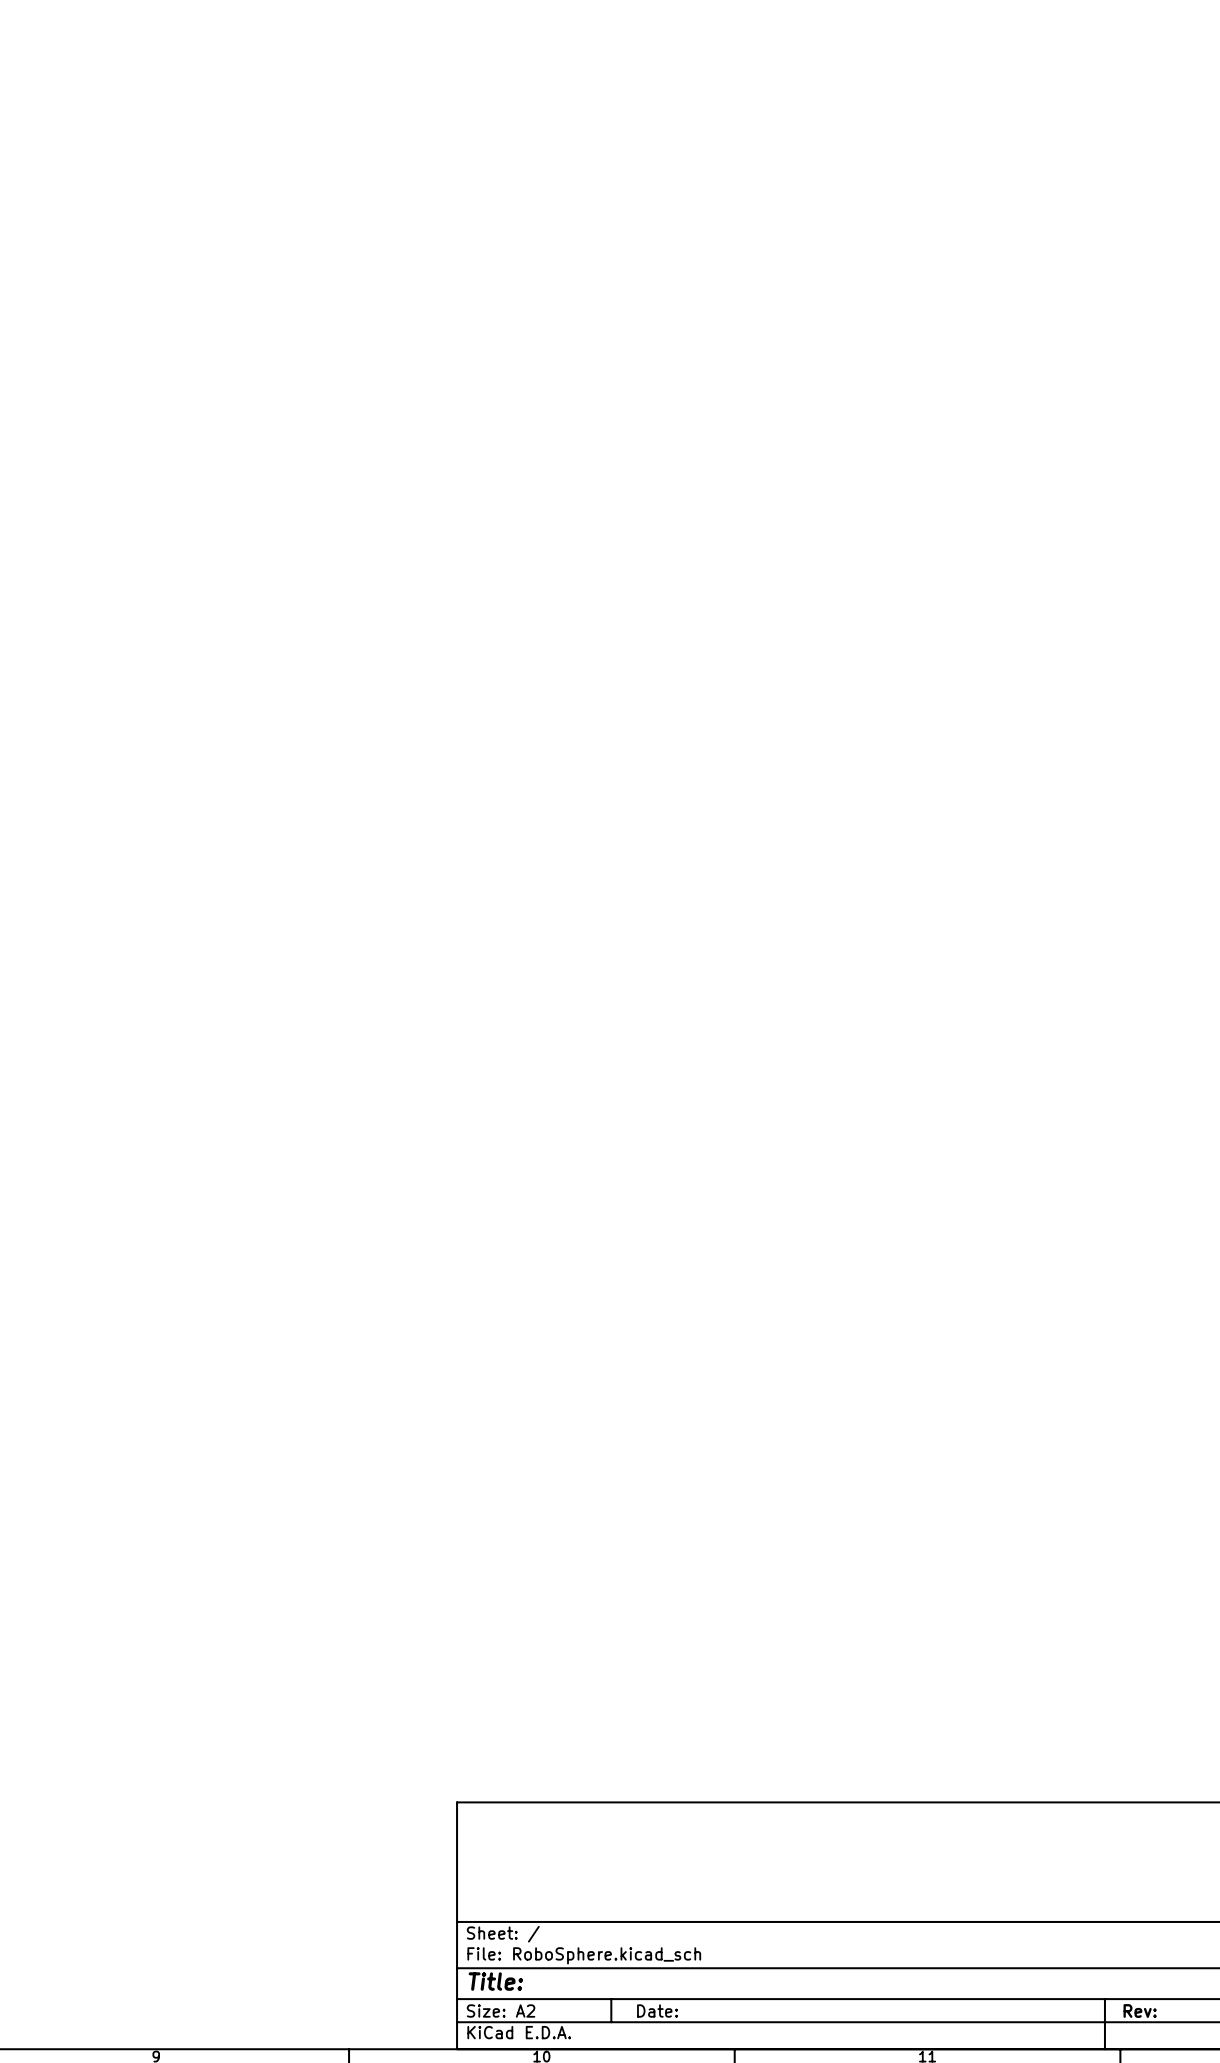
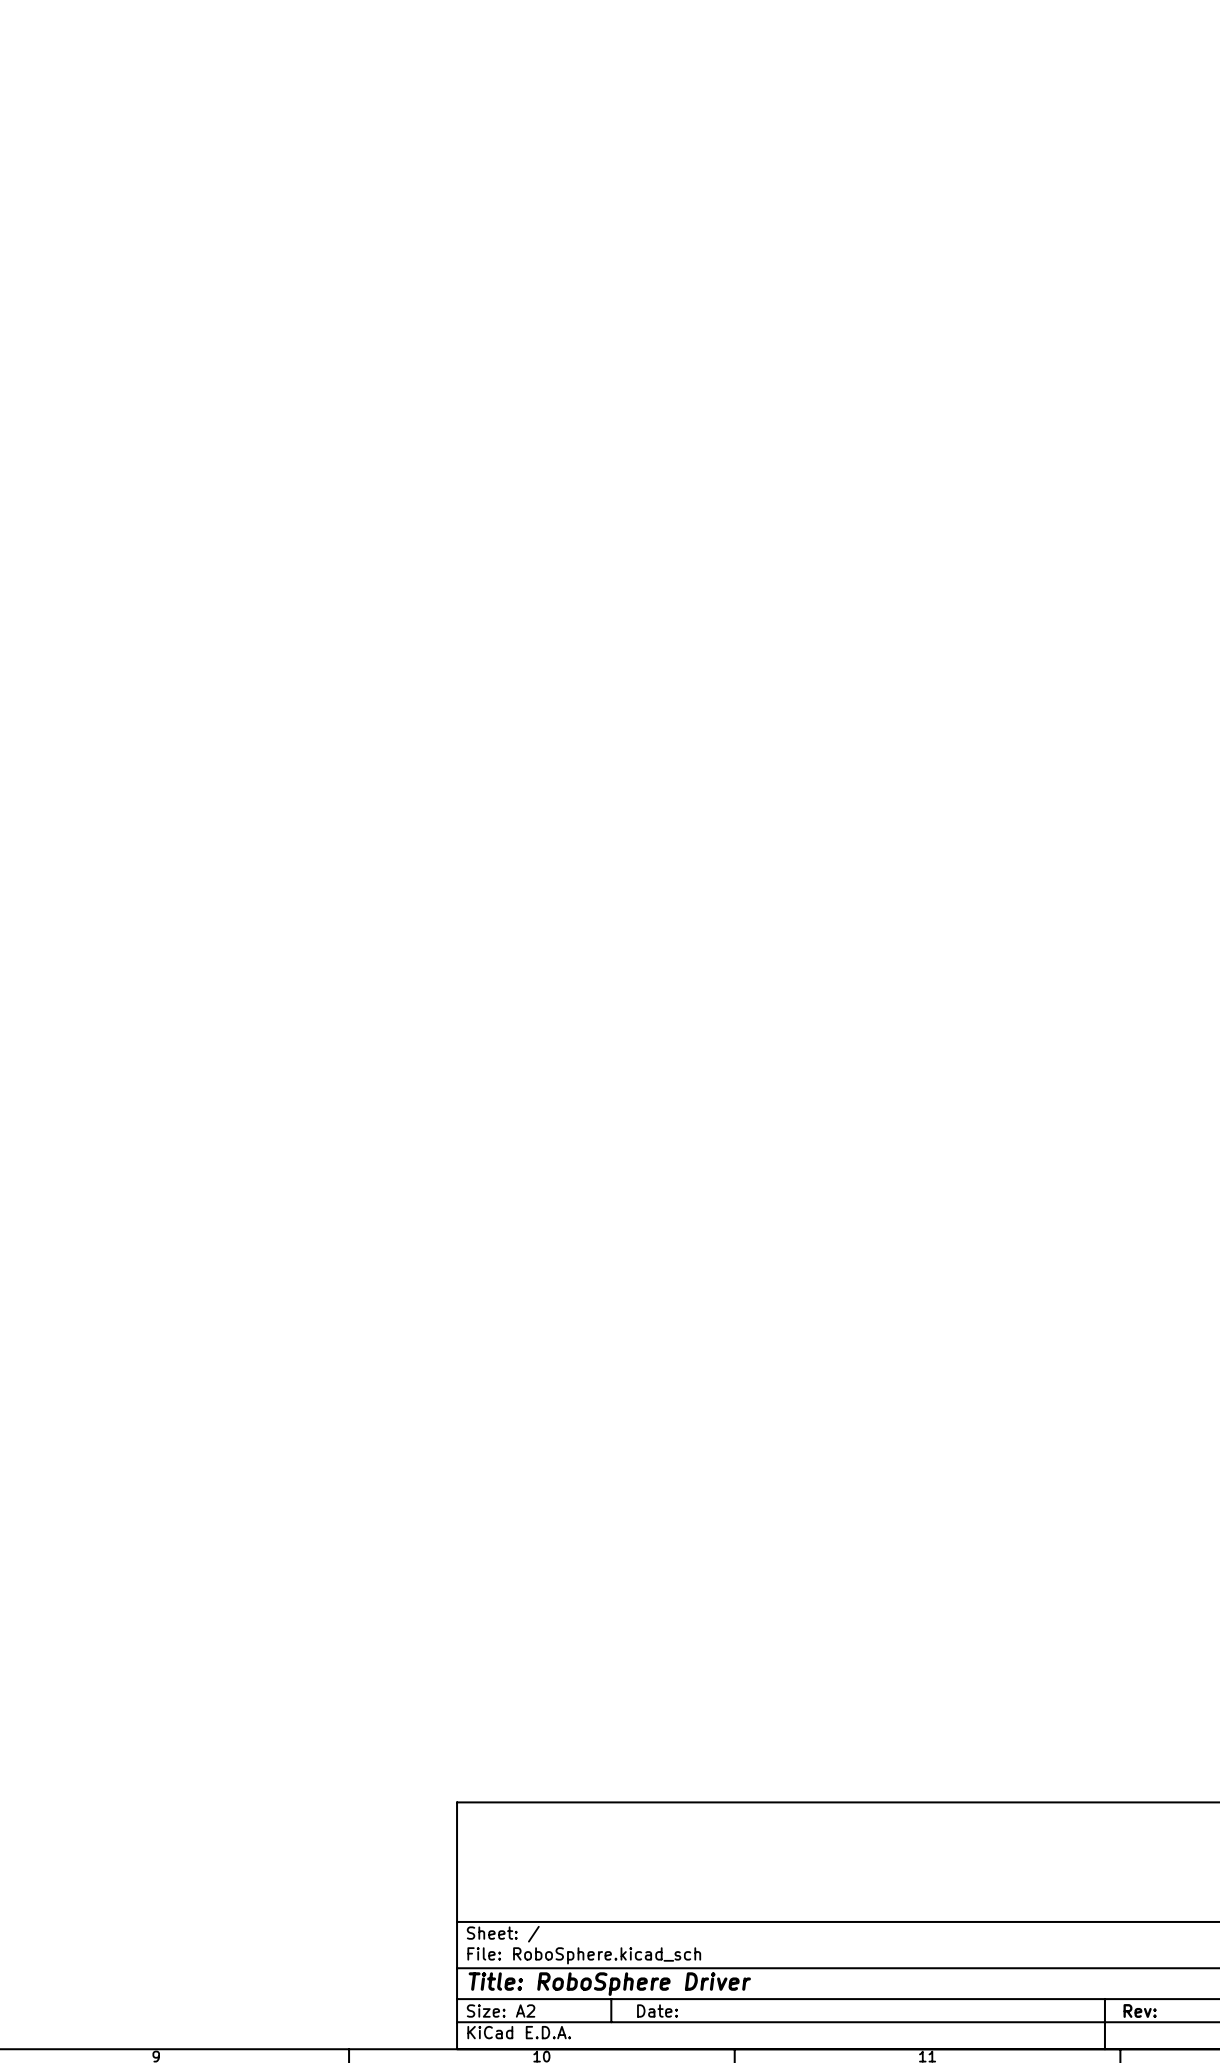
title block: Title: (495, 1981) -> Title: RoboSphere Driver (609, 1984)

